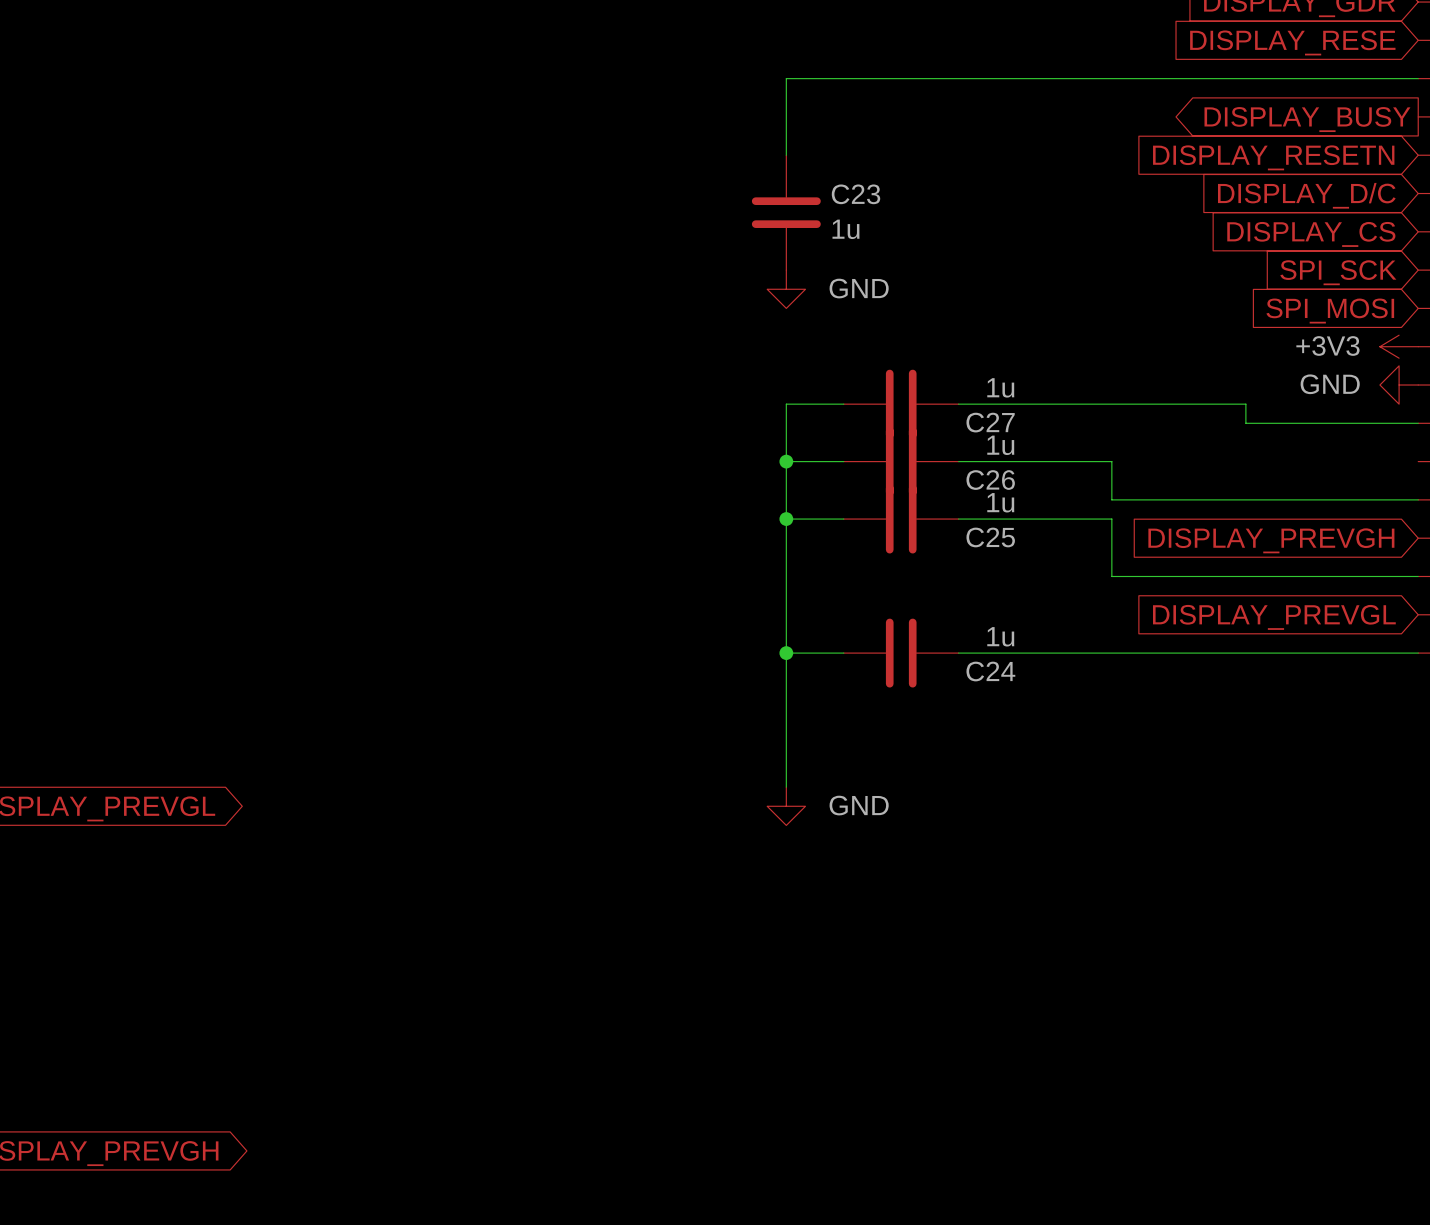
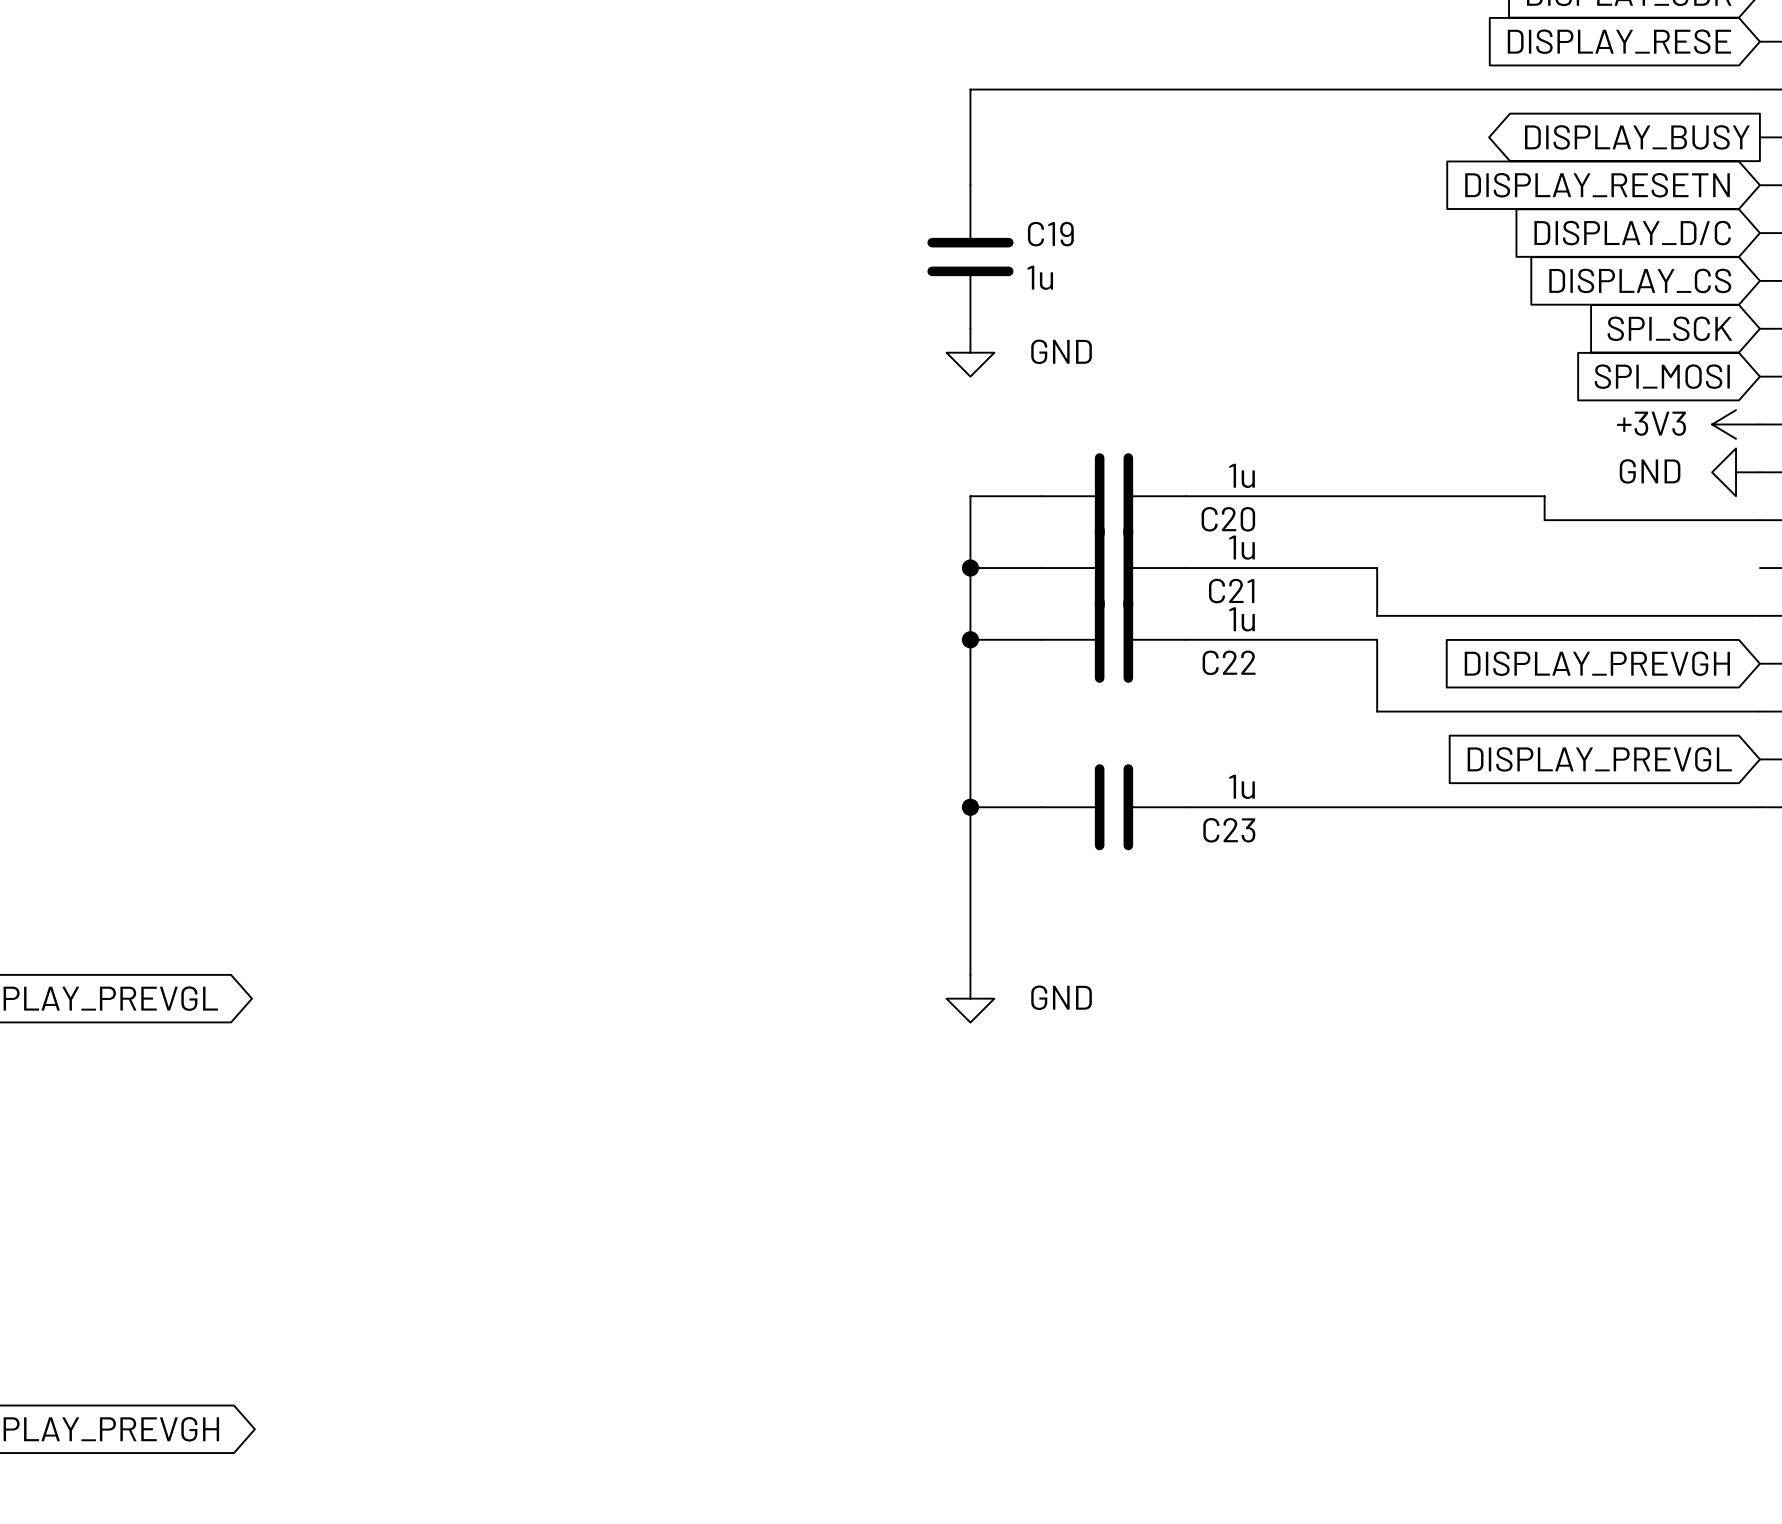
C23 name: C23 (856, 194) -> C19 (1050, 234)
C27 name: C27 (990, 422) -> C20 (1228, 519)
C26 name: C26 (990, 480) -> C21 (1231, 591)
C25 name: C25 (990, 537) -> C22 (1229, 662)
C24 name: C24 (990, 671) -> C23 (1229, 830)

